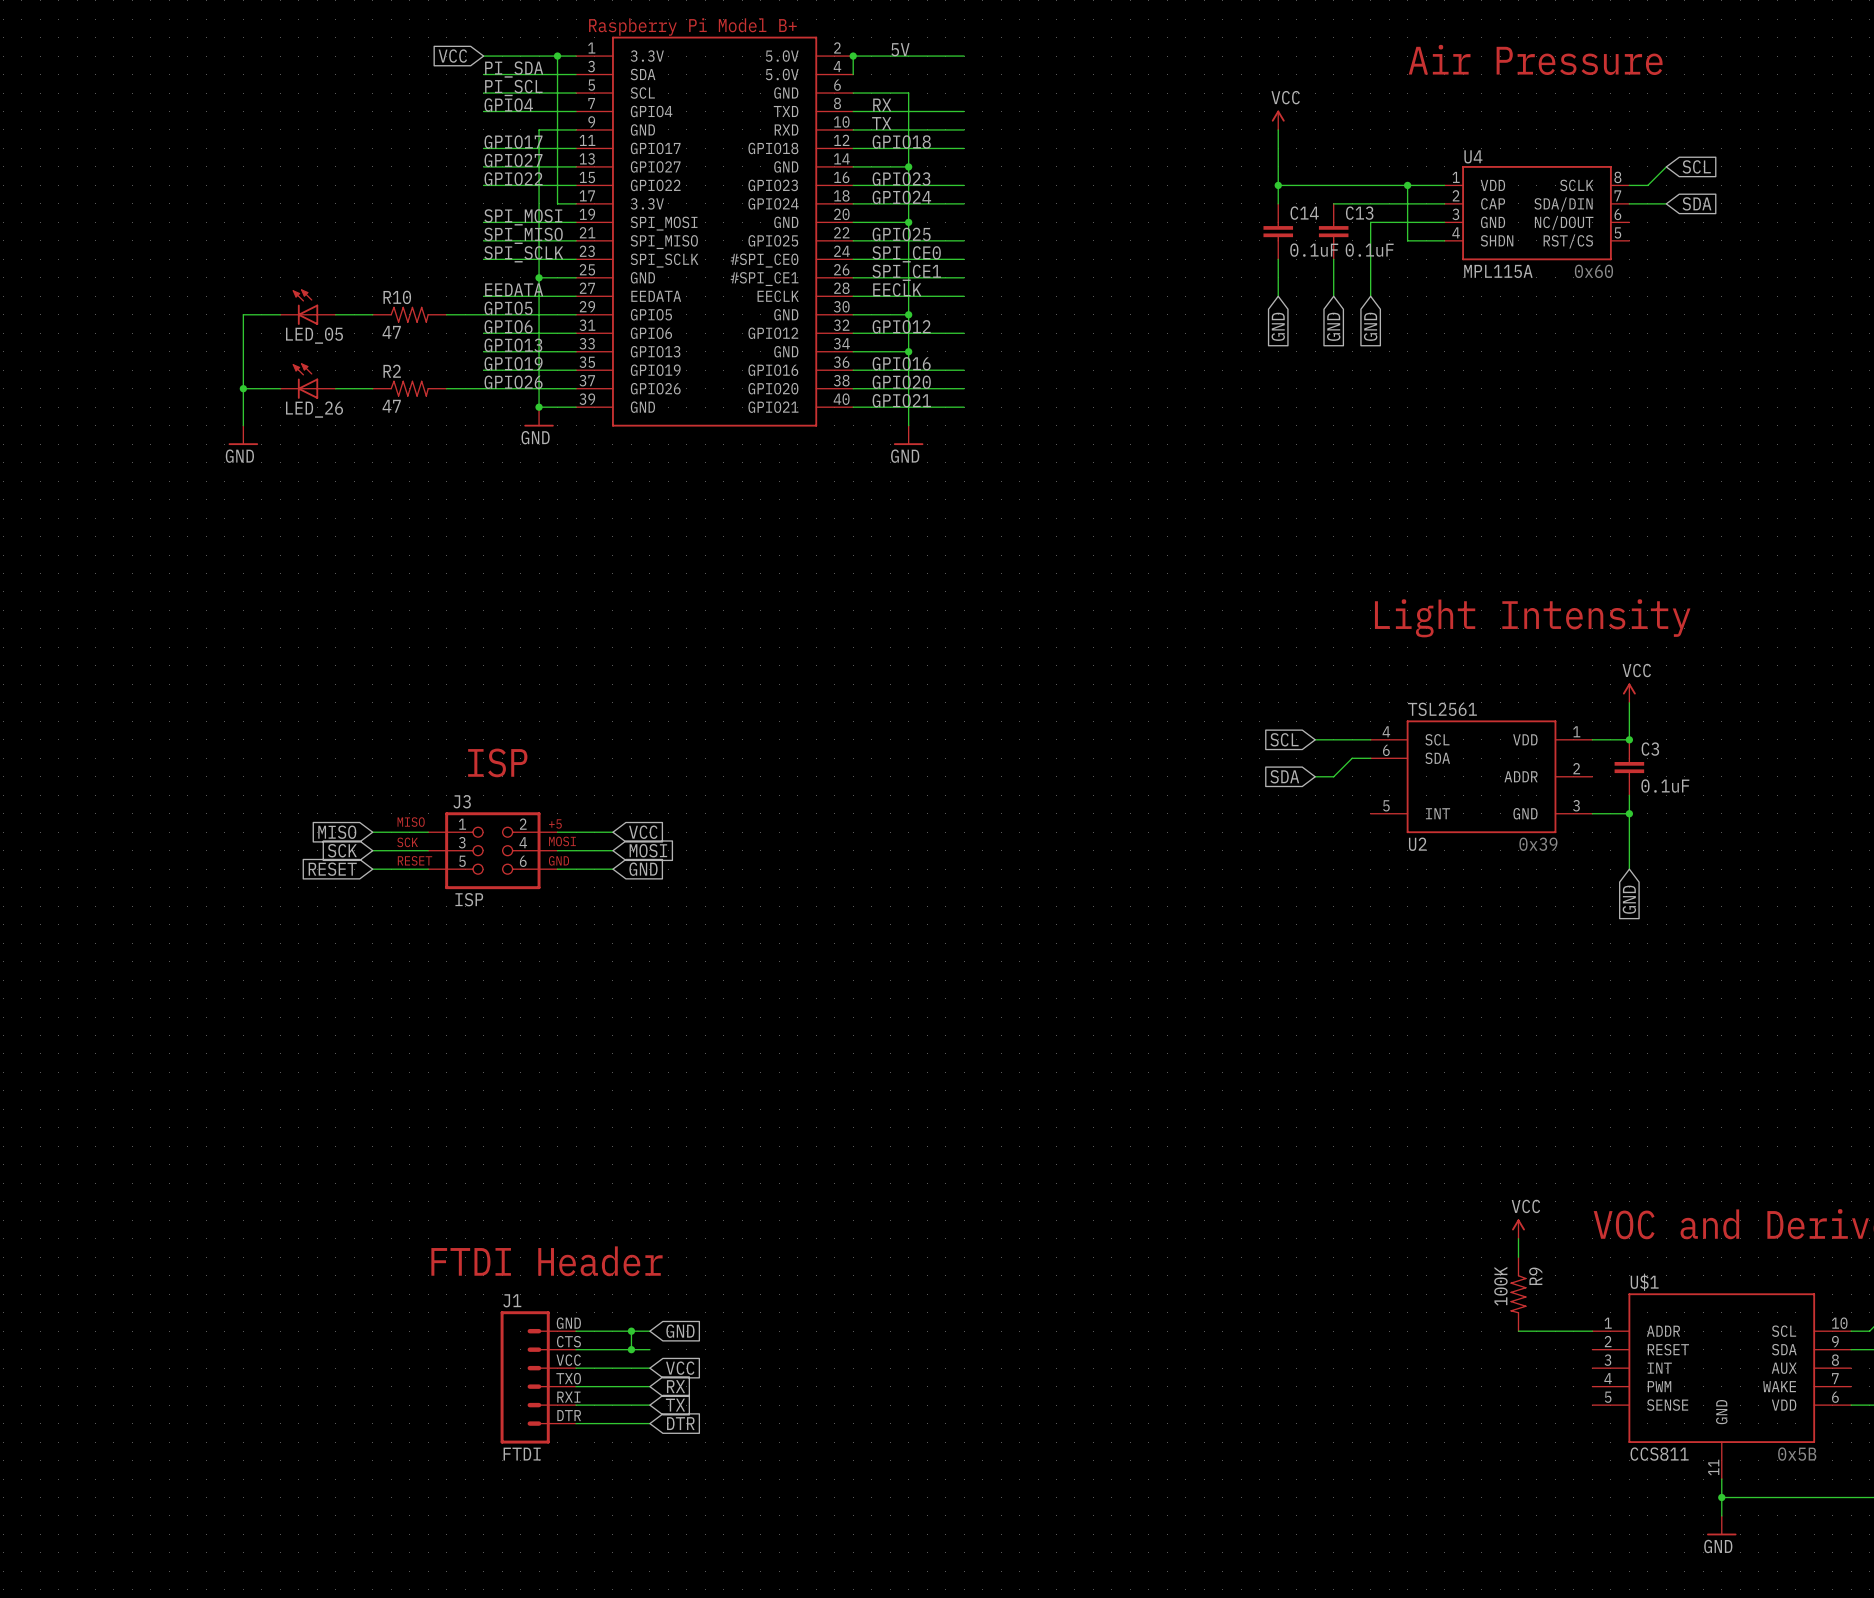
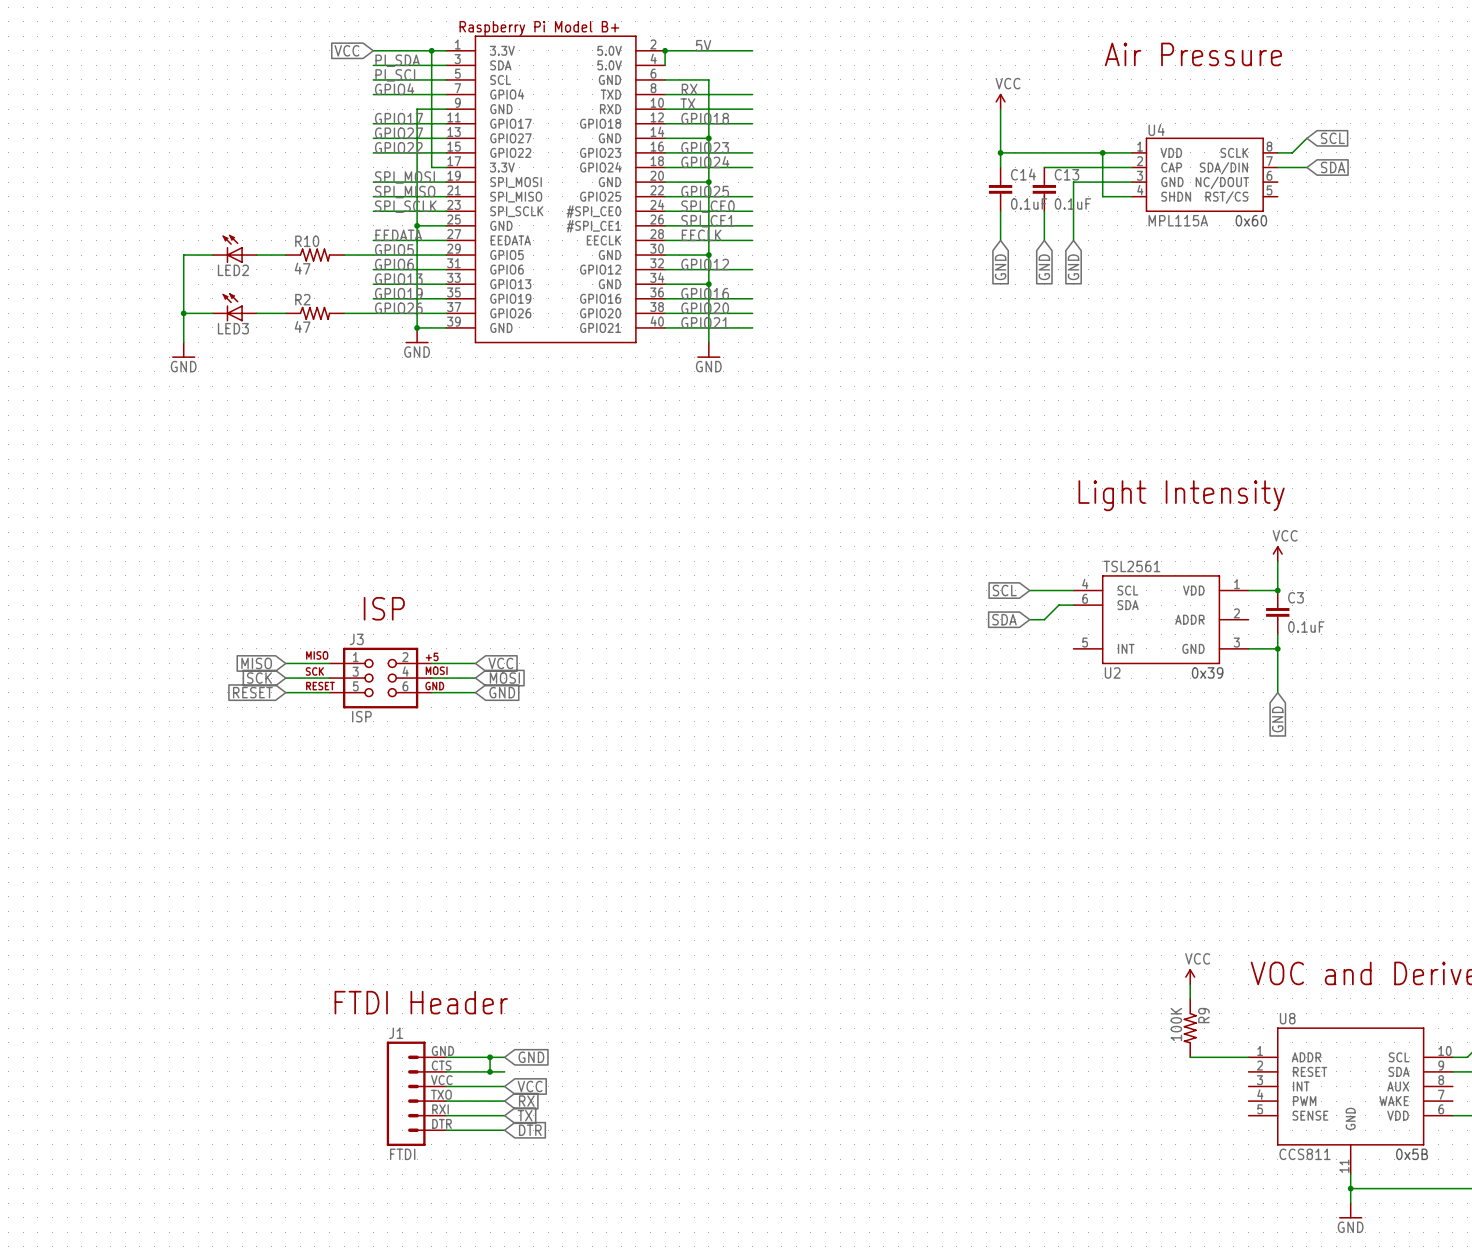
LED_05 name: LED_05 (314, 335) -> LED2 (233, 270)
LED_26 name: LED_26 (314, 409) -> LED3 (233, 328)
U$1 name: U$1 (1644, 1282) -> U8 (1287, 1018)

